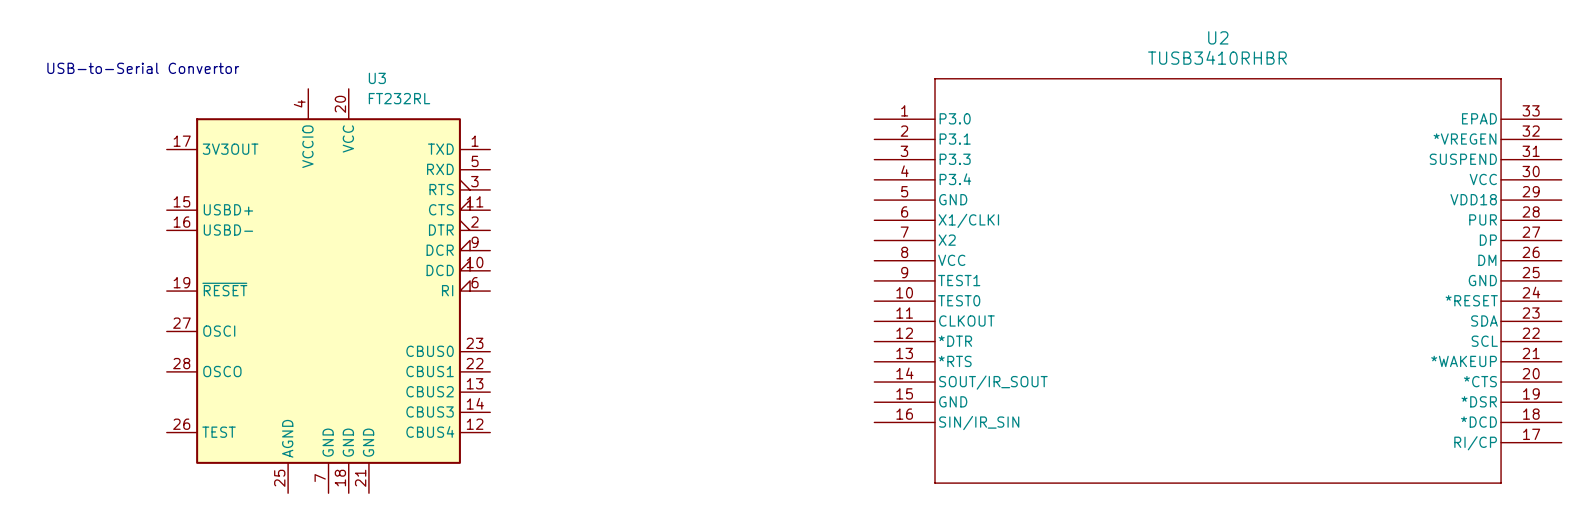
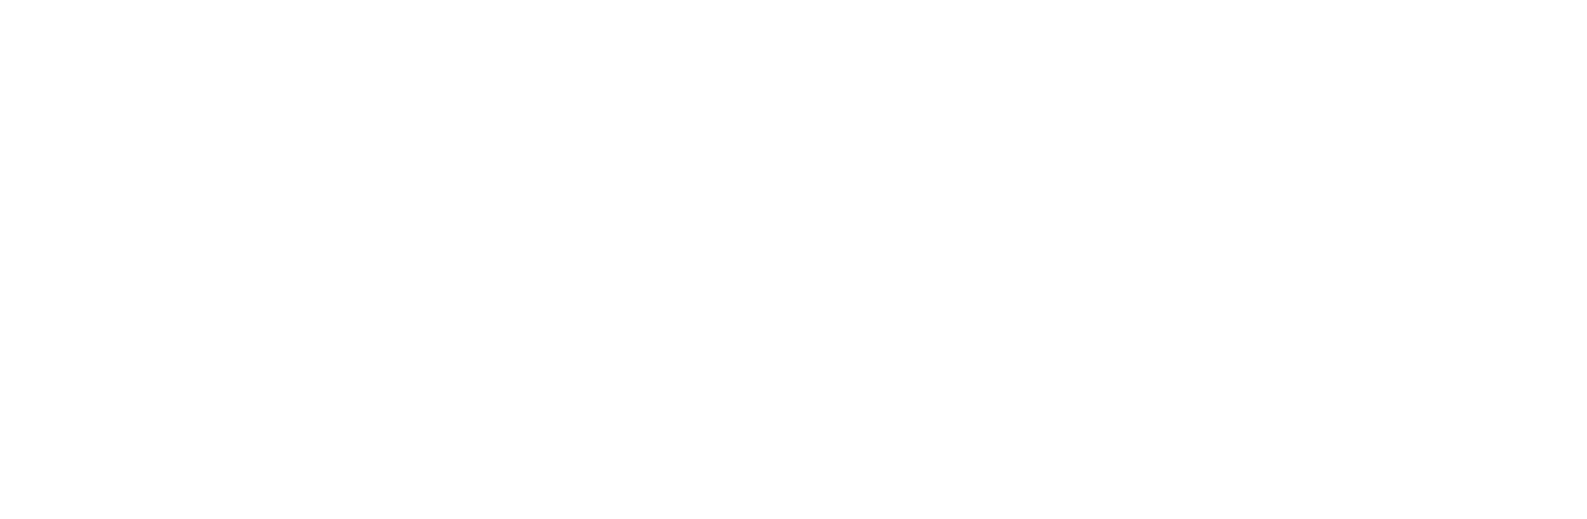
text: USB-to-Serial Convertor (143, 68) -> none
U2: TUSB3410RHBR (1218, 280) -> none
U3: FT232RL (328, 291) -> none

